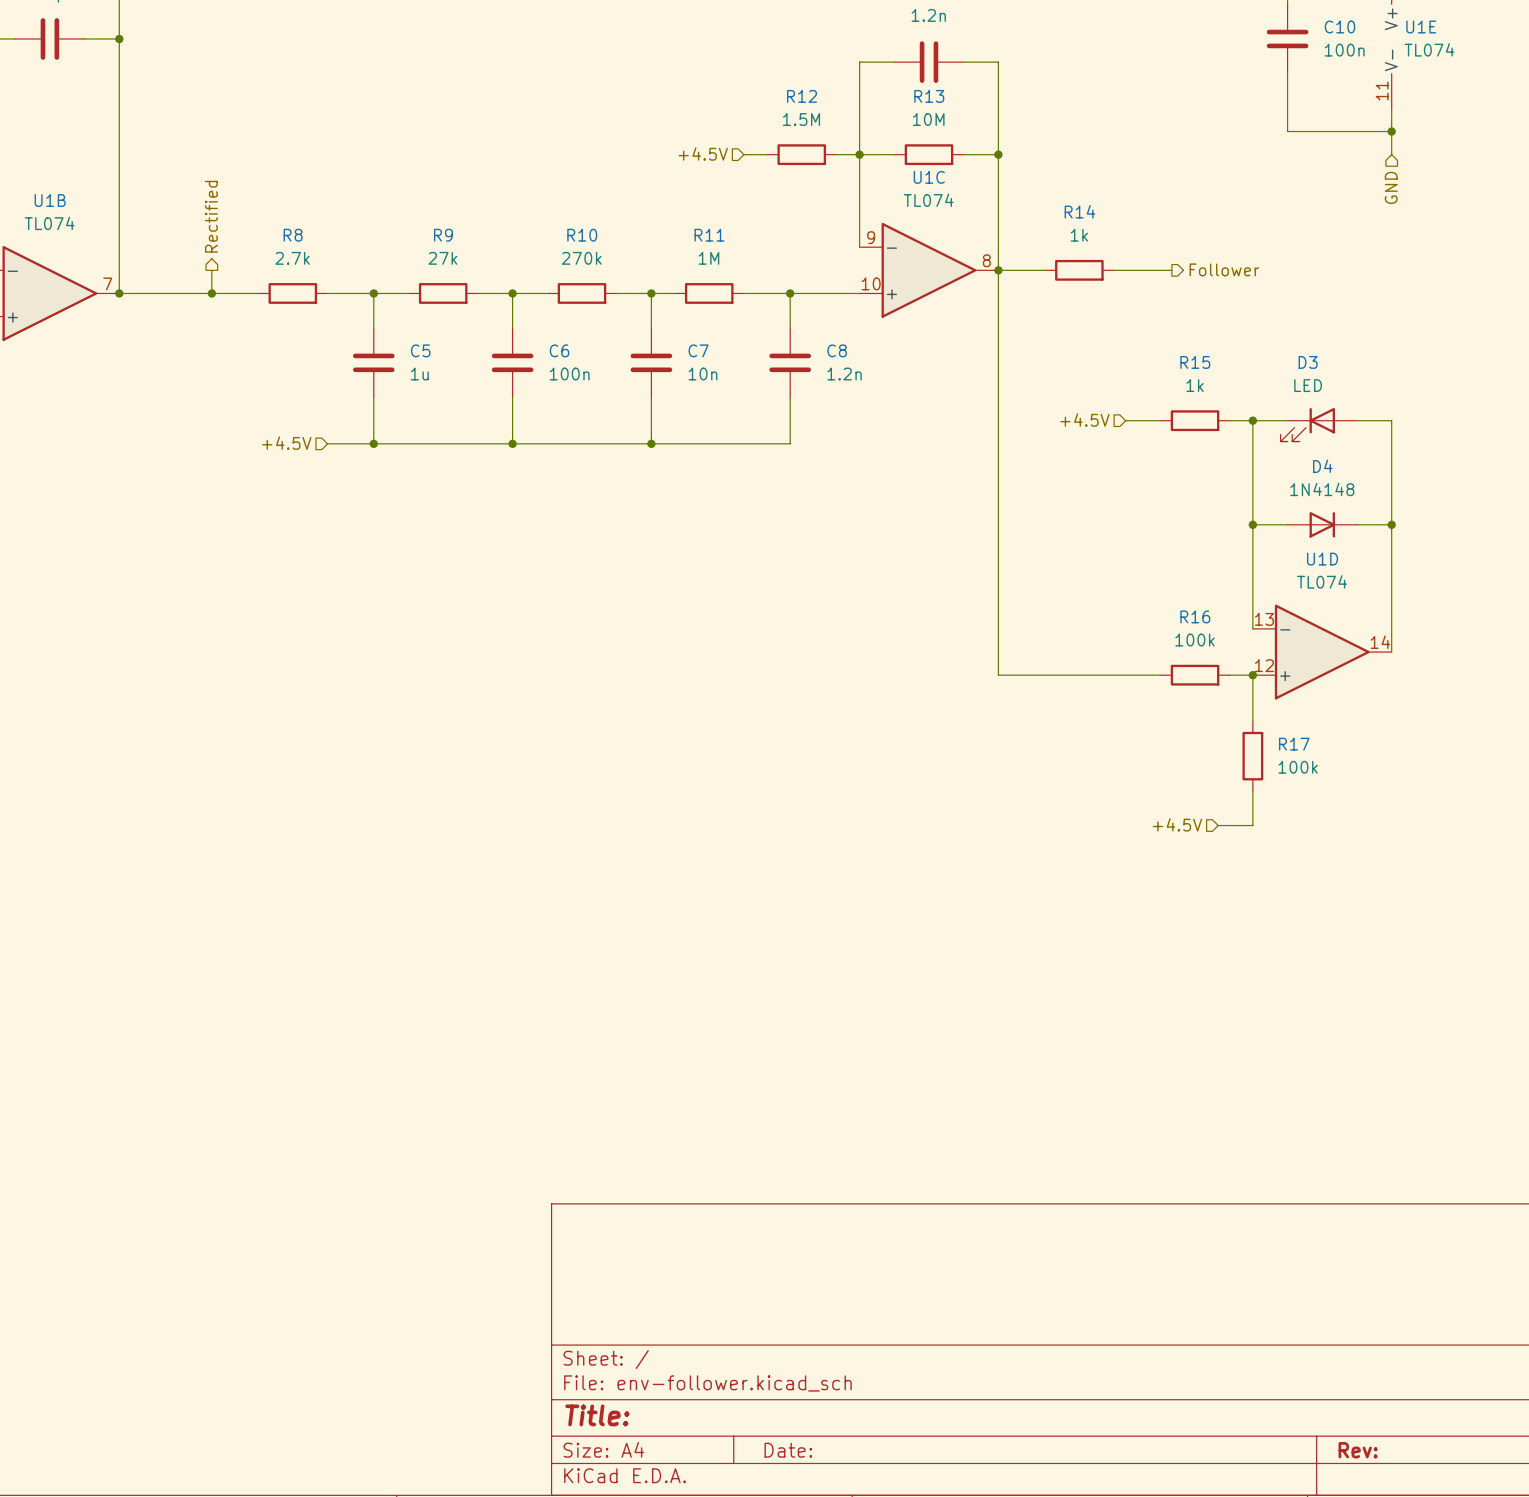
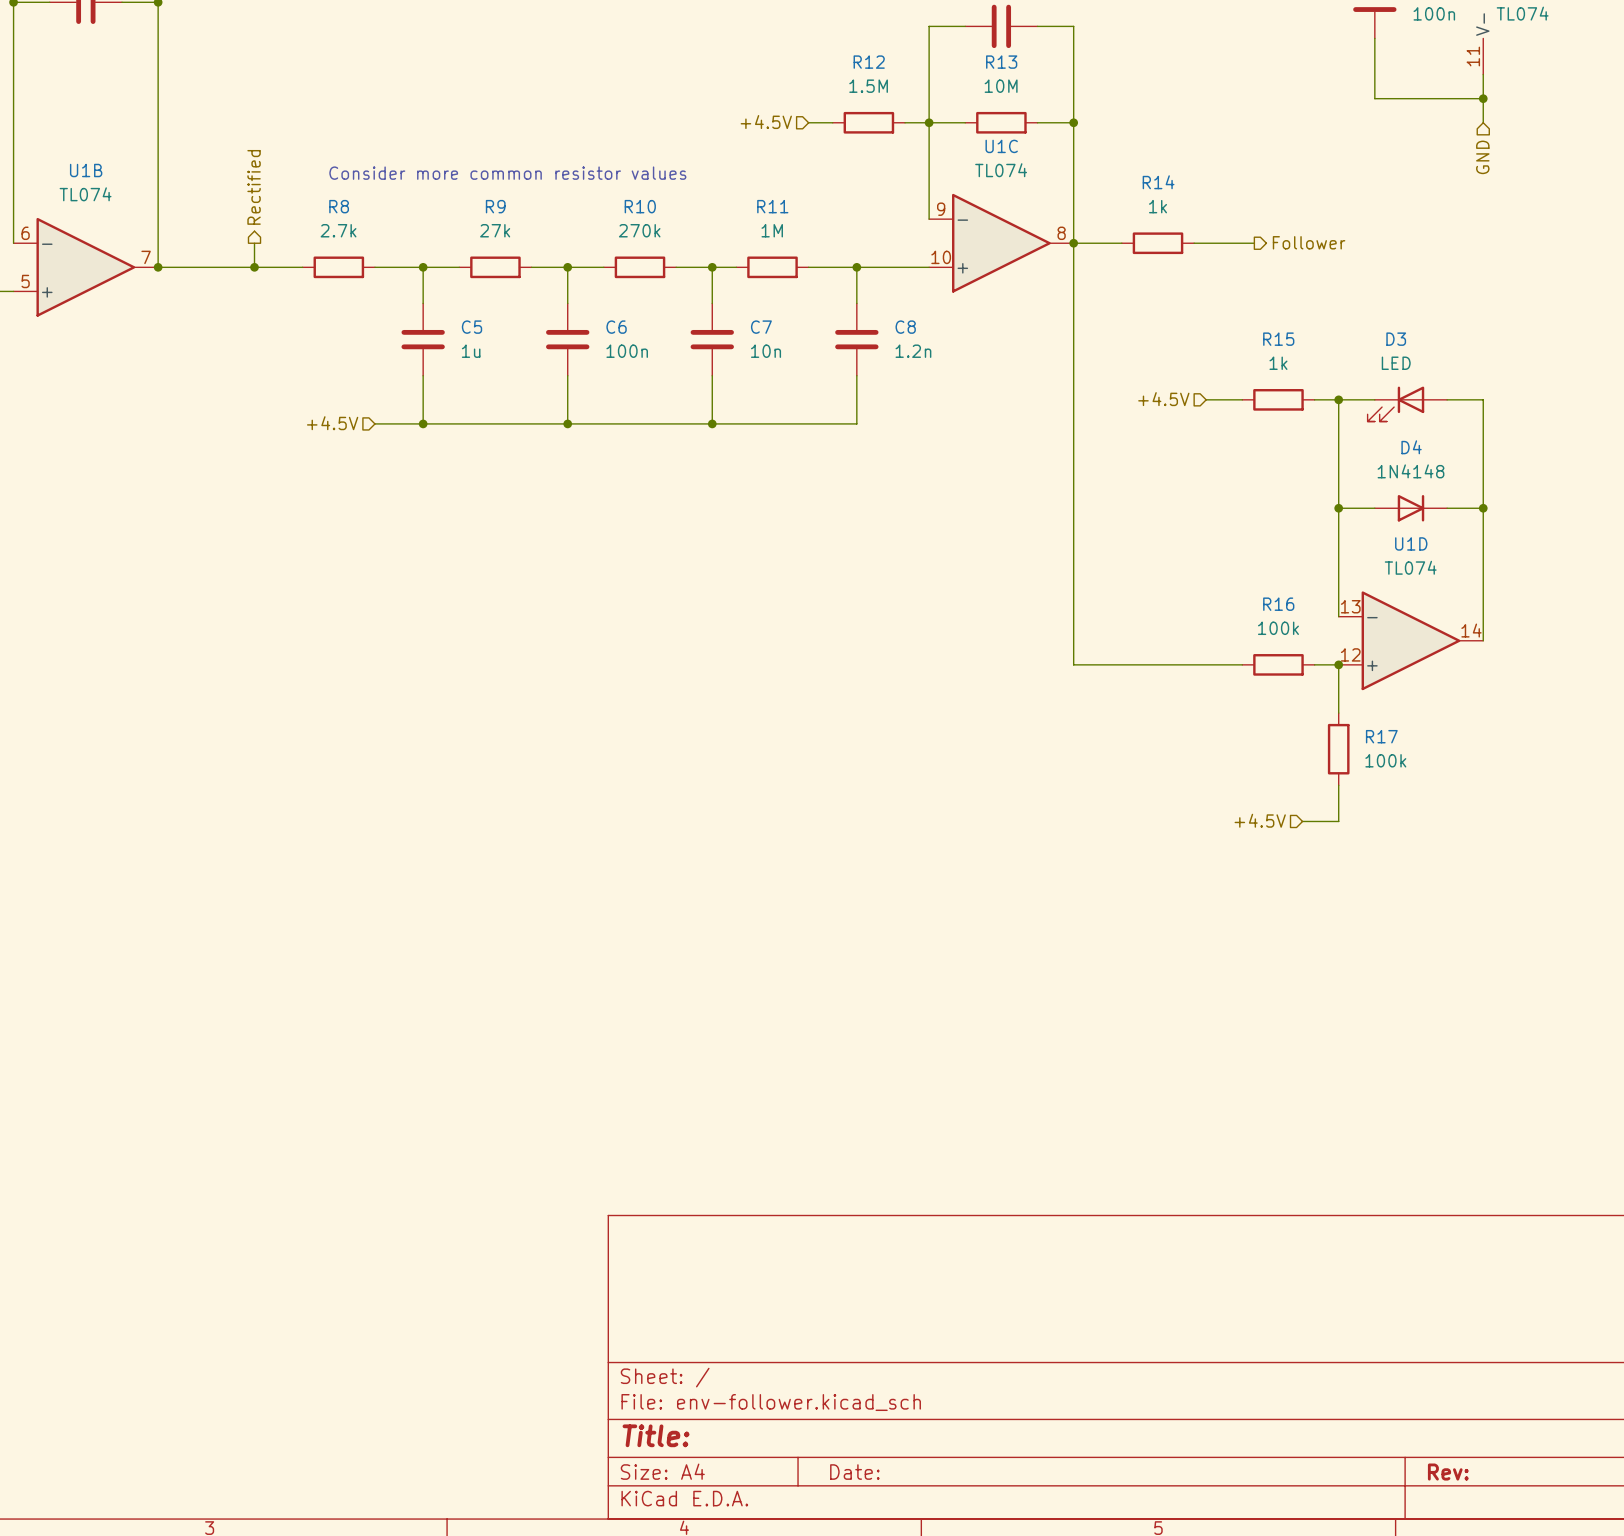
text: none -> Consider more common resistor values (507, 173)

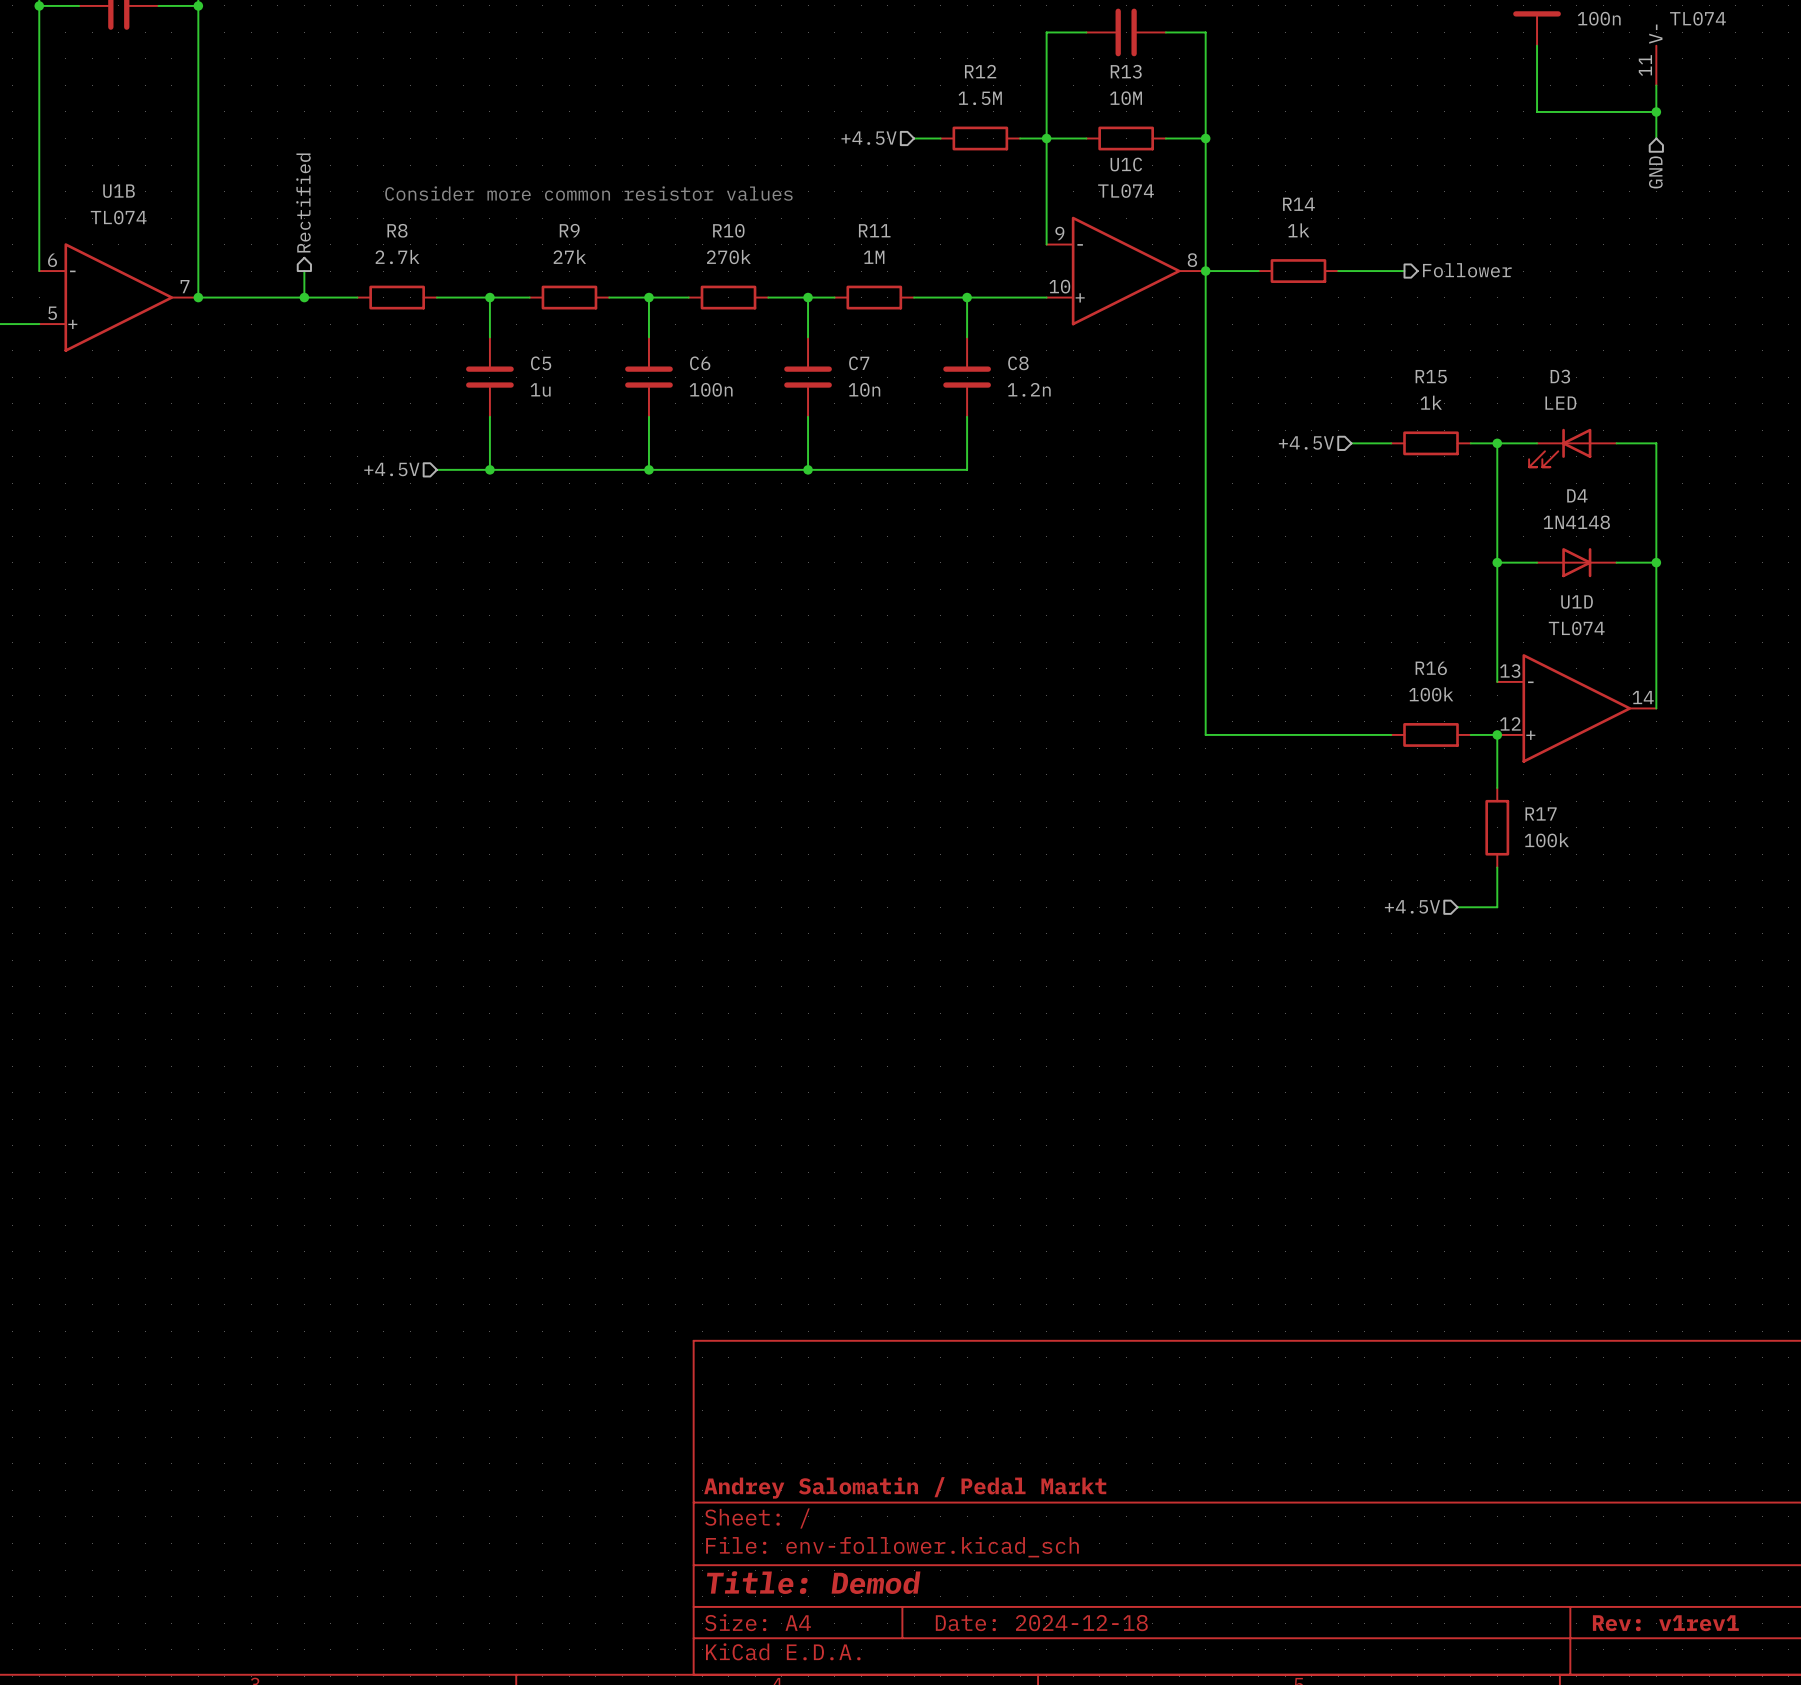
title block: none -> Andrey Salomatin / Pedal Markt (905, 1487)
title block: Title: (656, 1435) -> Title: Demod (813, 1582)
title block: Date: (854, 1472) -> Date: 2024-12-18 (1041, 1623)
title block: Rev: (1448, 1472) -> Rev: v1rev1 (1665, 1623)

